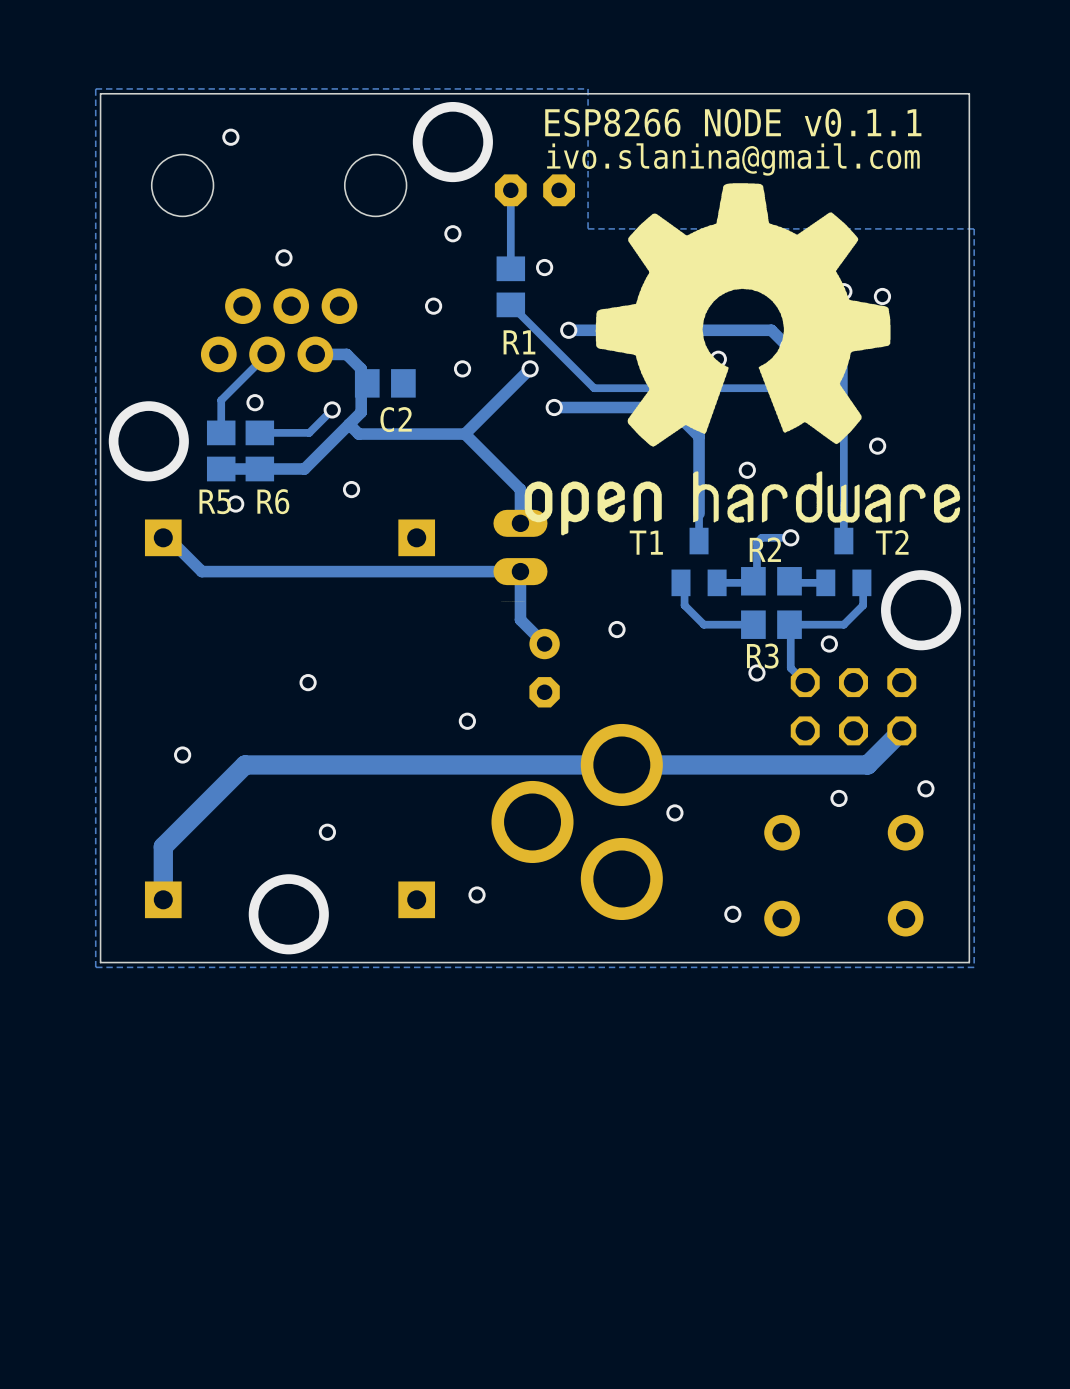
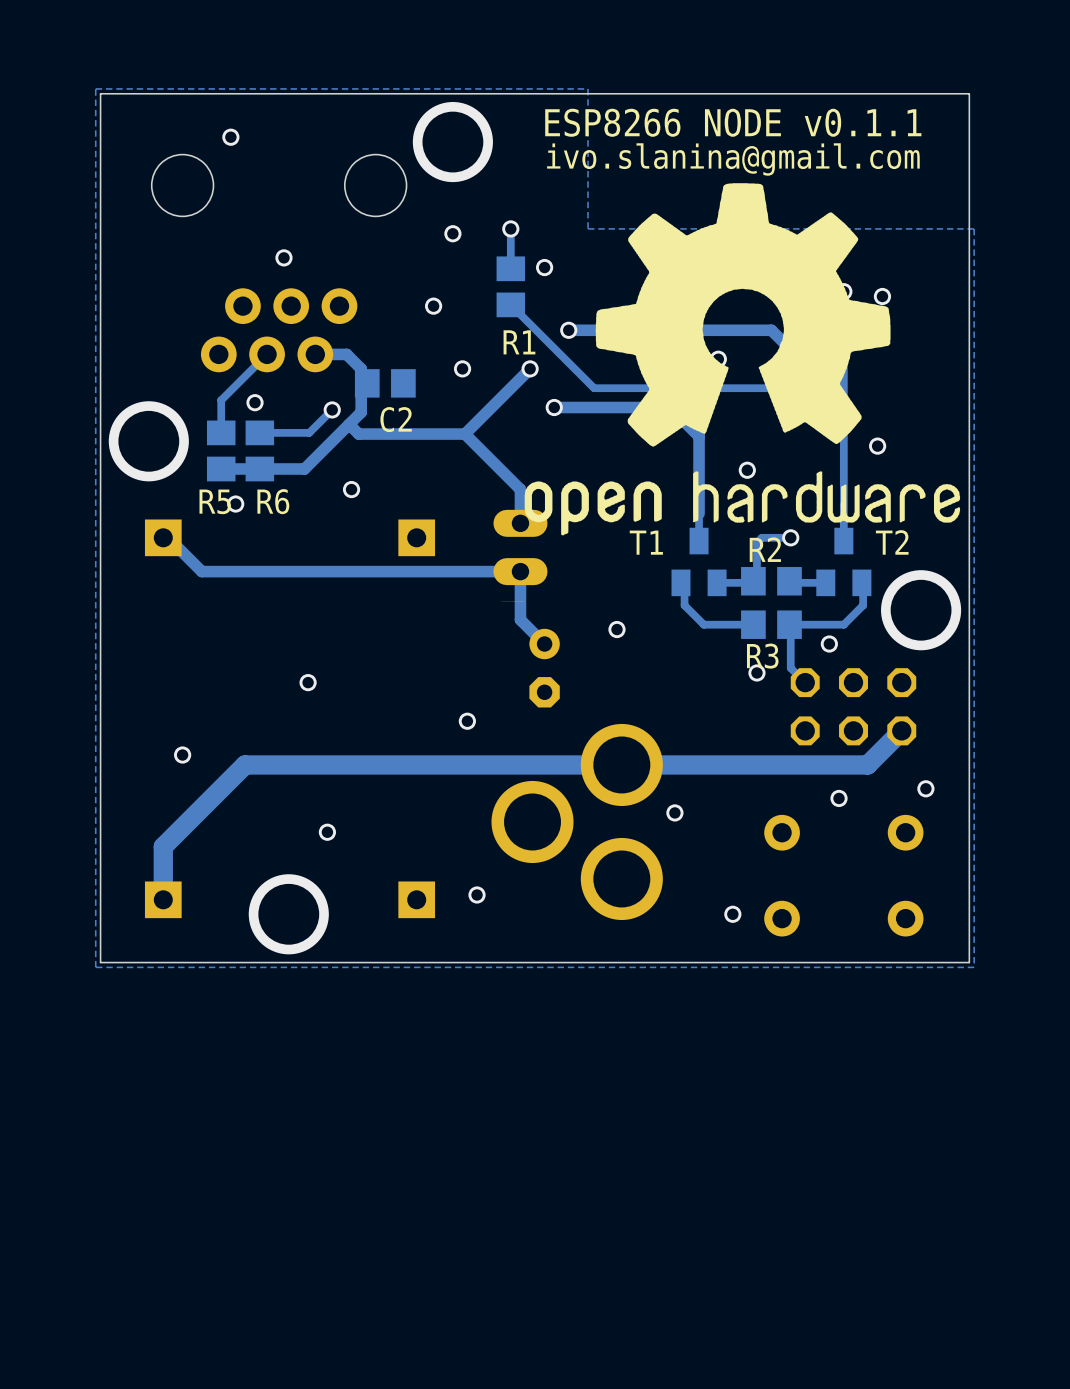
track: (510, 190) (510, 228) -> none
part: (534, 190) -> none
via: none -> (510, 228)

